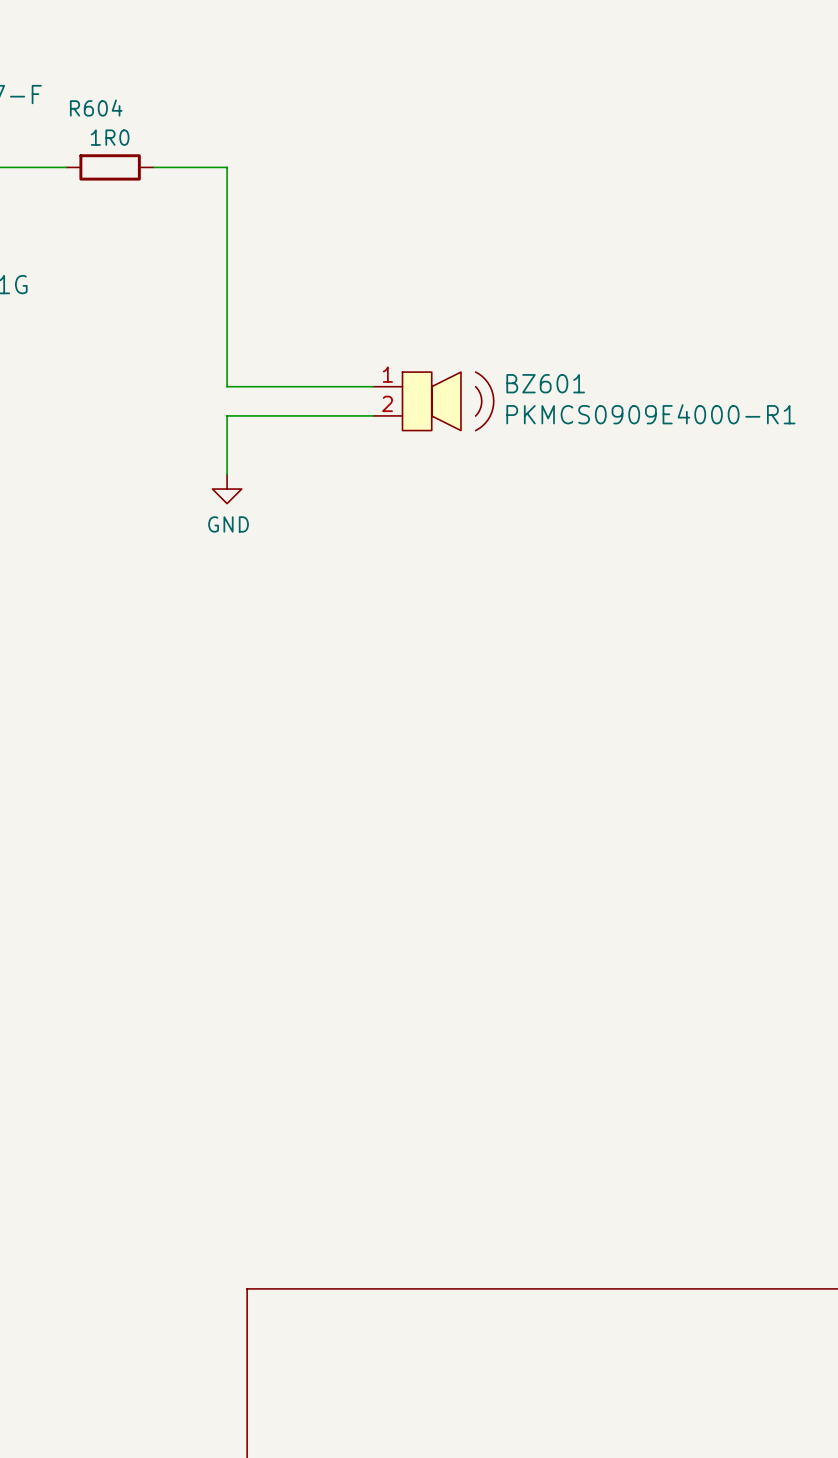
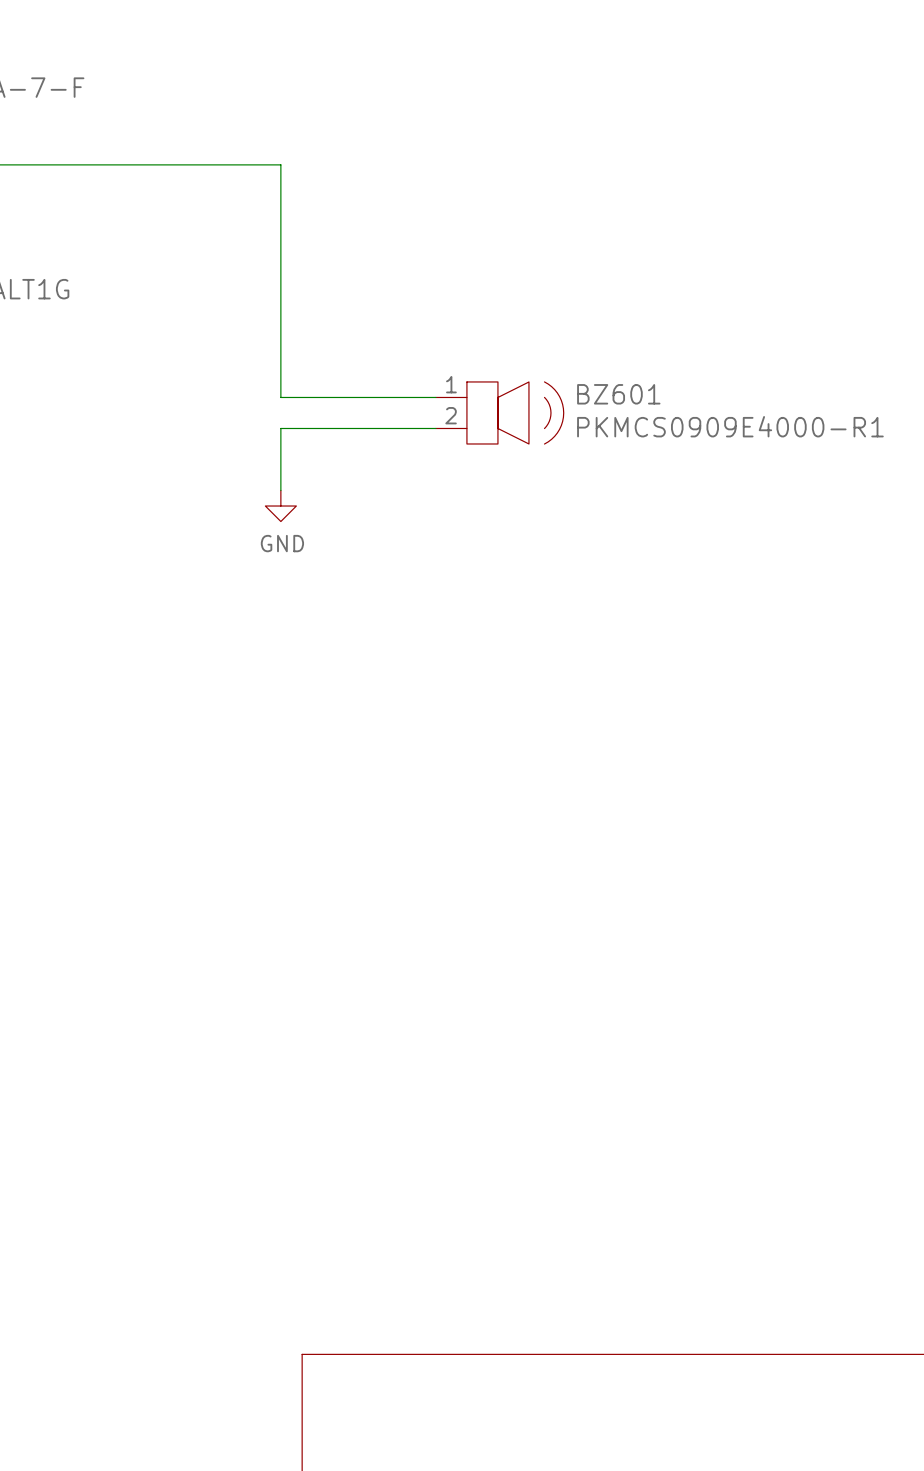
wire: none -> (110, 164) (203, 164)
R604: 1R0 (110, 167) -> none

